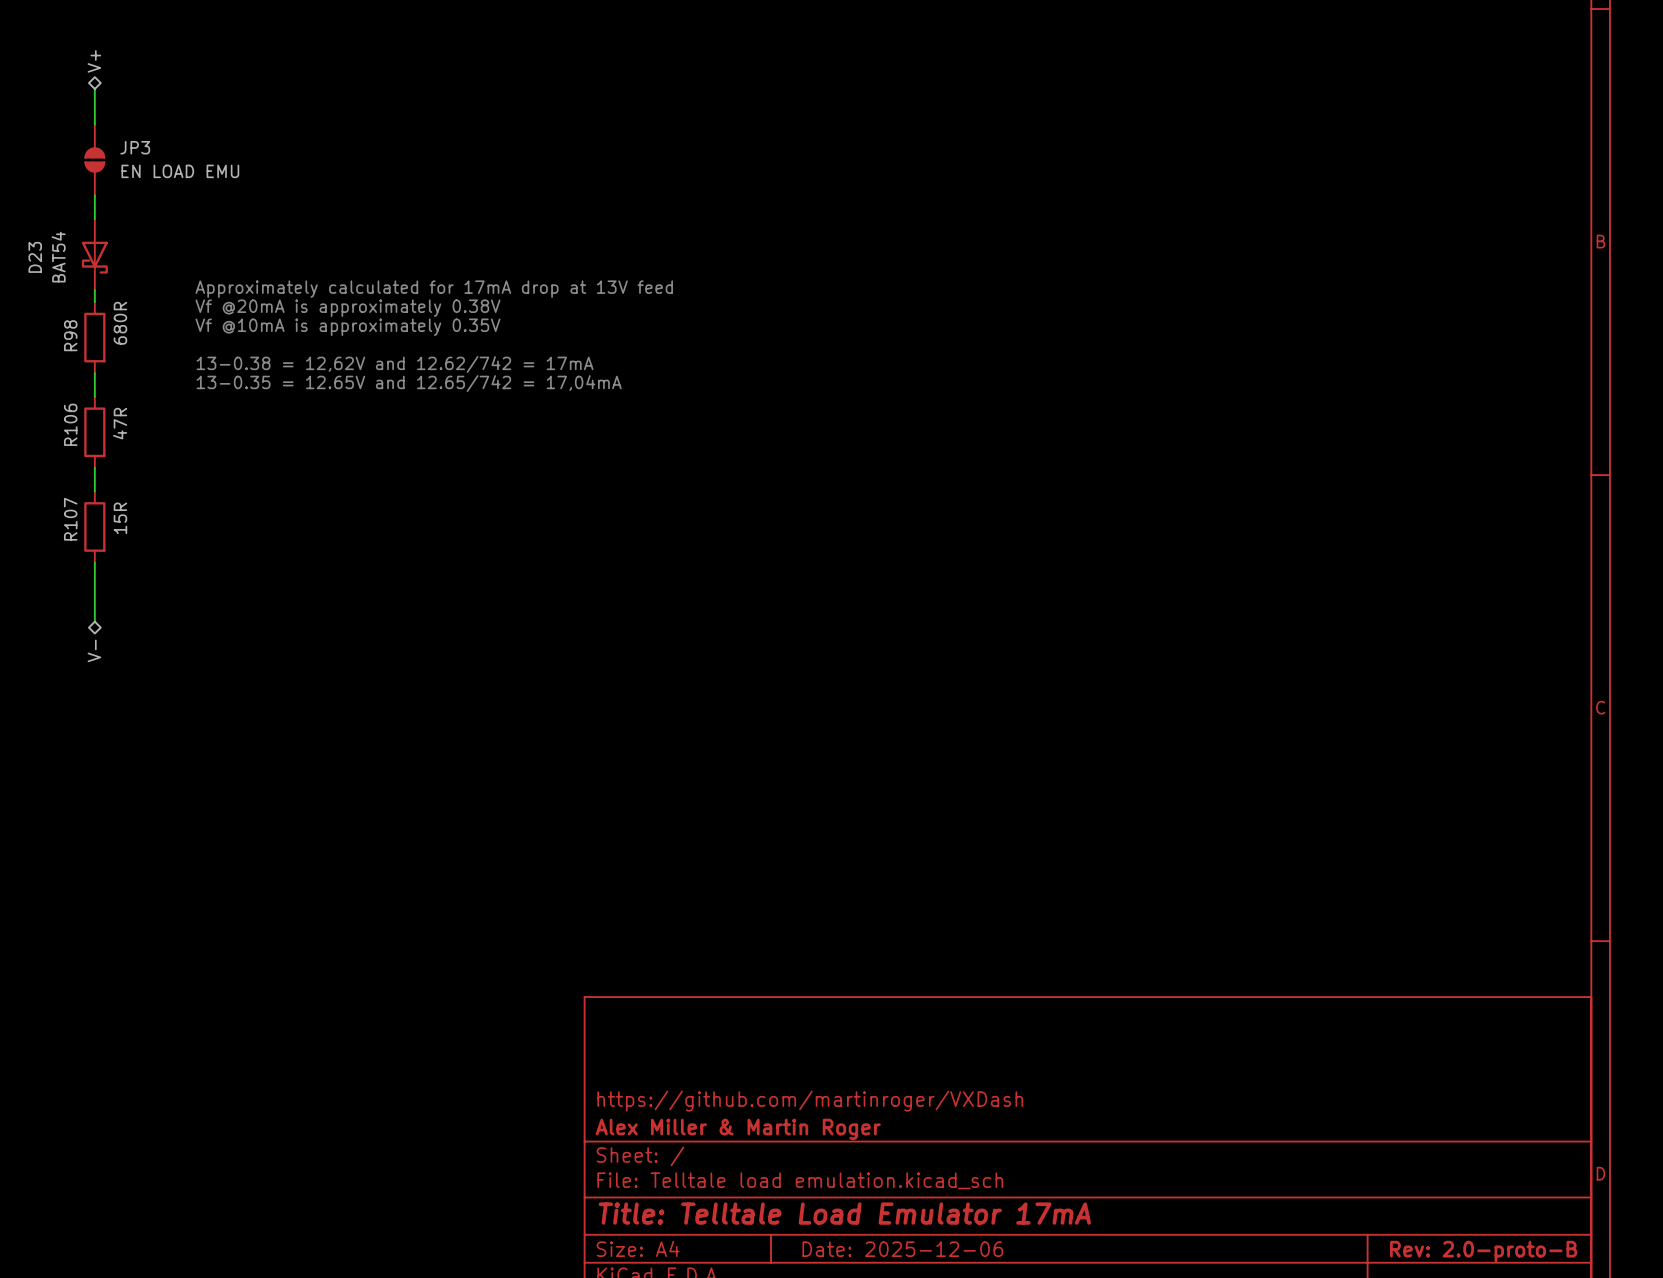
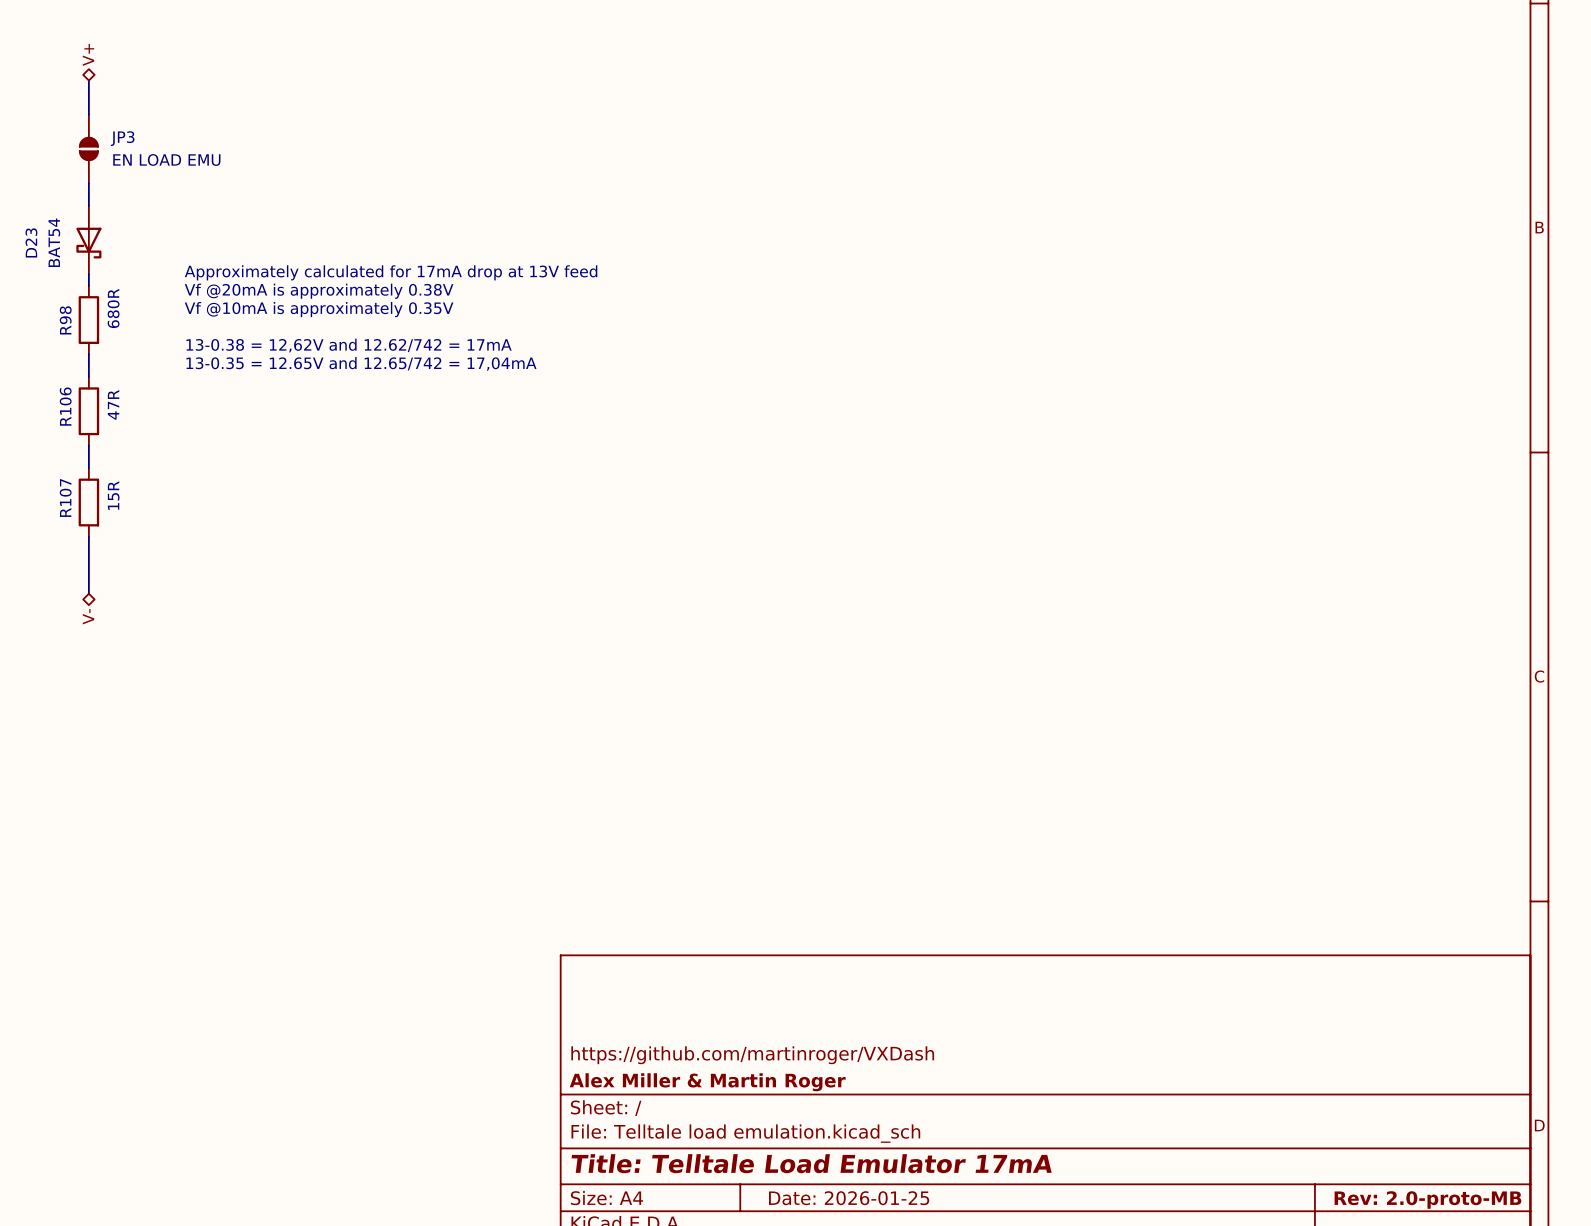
title block: Date: 2025-12-06 (902, 1249) -> Date: 2026-01-25 (849, 1198)
title block: Rev: 2.0-proto-B (1483, 1251) -> Rev: 2.0-proto-MB (1427, 1199)

